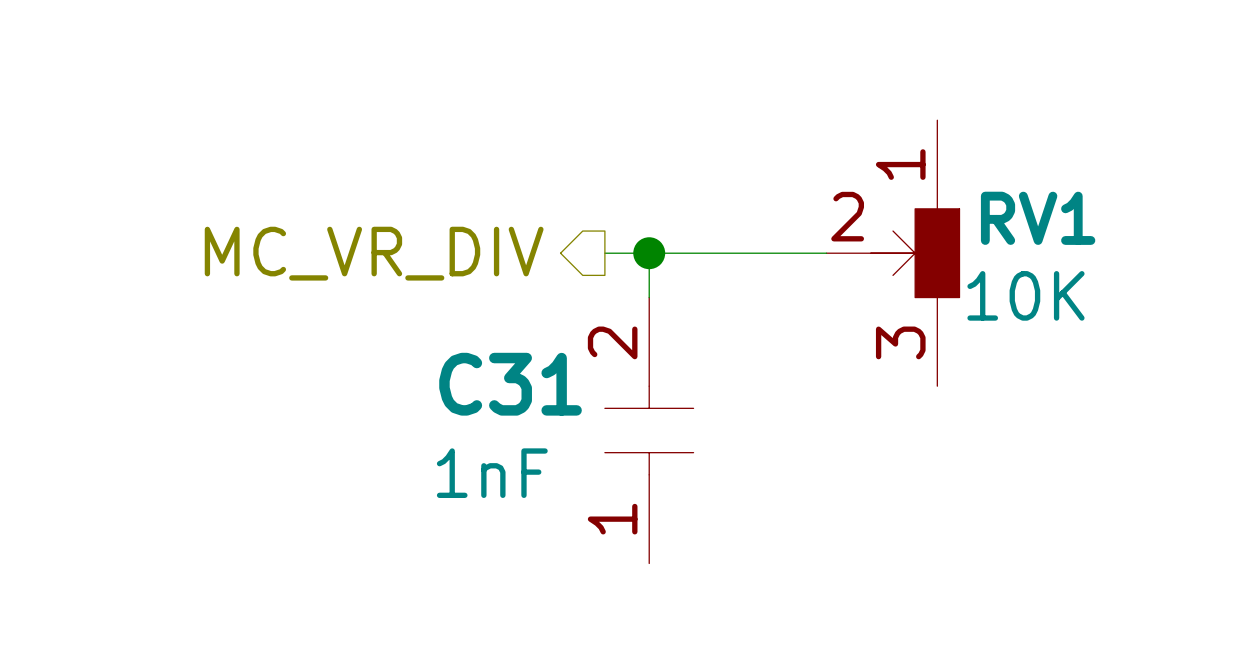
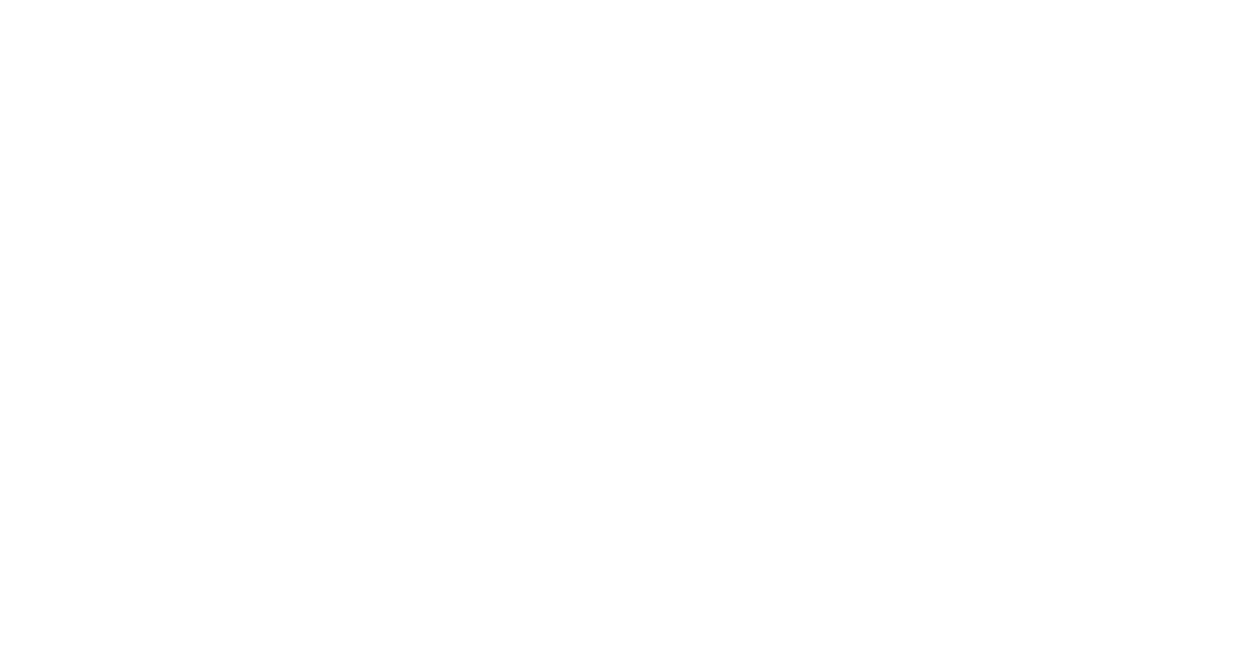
hierarchical label: MC_VR_DIV (374, 253) -> none
wire: (604, 253) (826, 253) -> none
wire: (649, 253) (649, 297) -> none
junction: (649, 253) -> none
RV1: 10K (893, 253) -> none
C31: 1nF (649, 430) -> none

